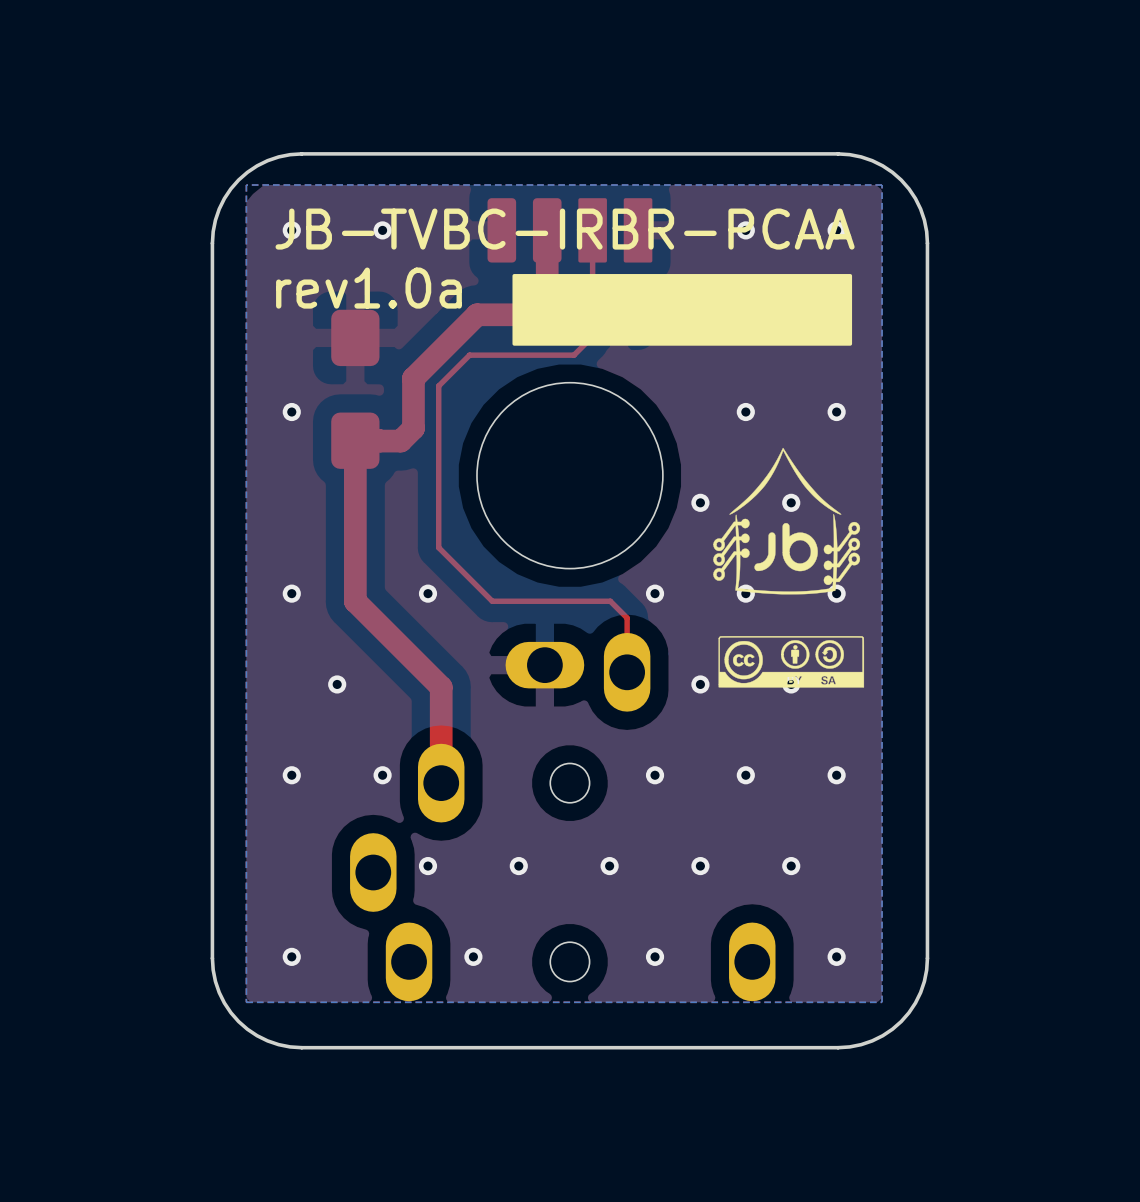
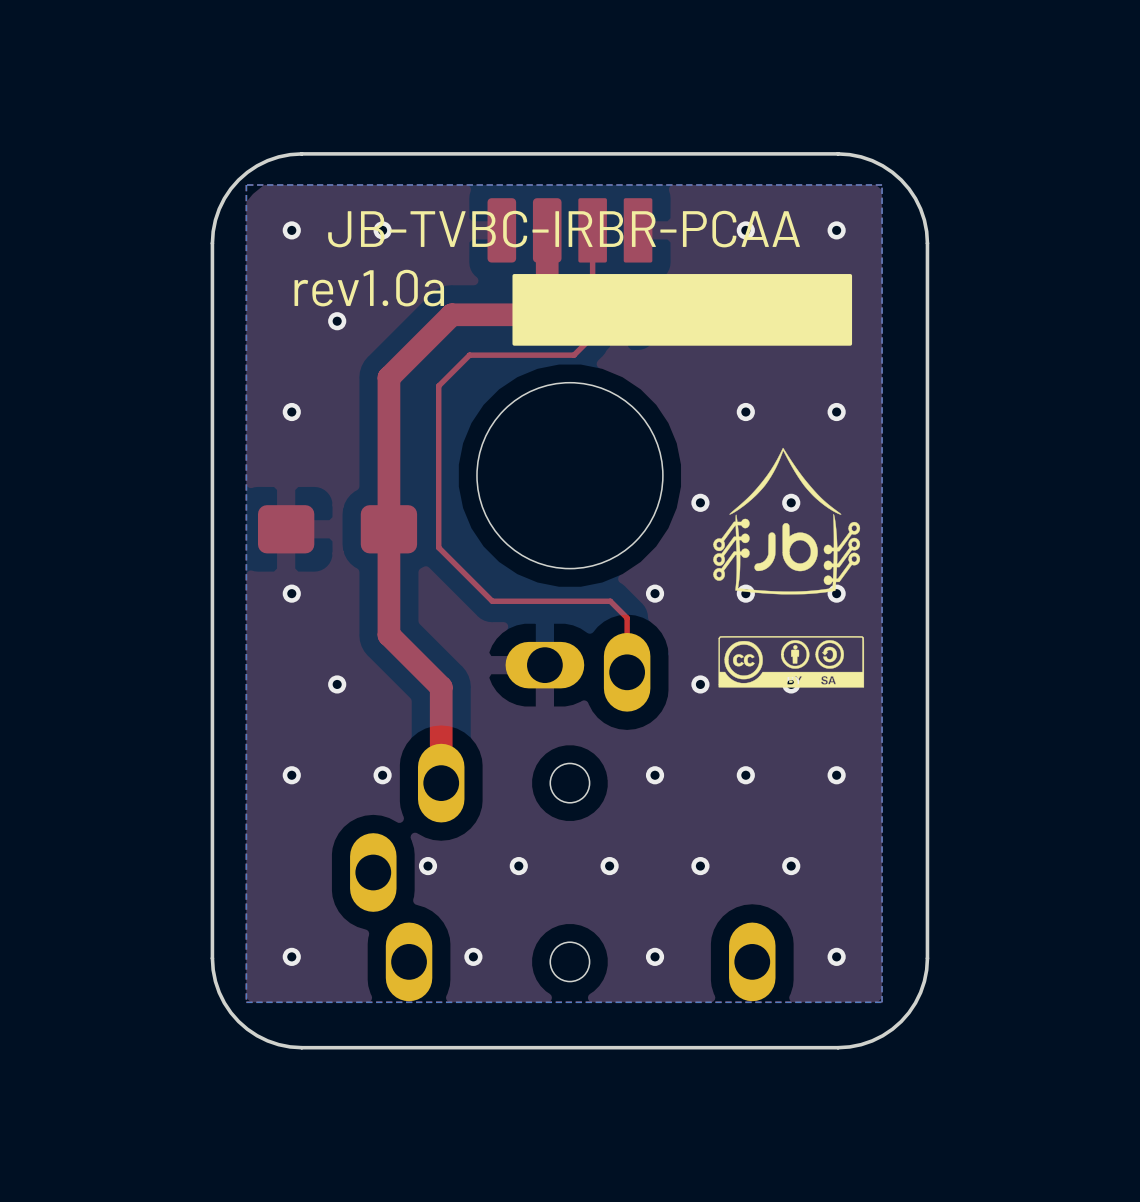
top track: (477, 314) (413, 378) (413, 428) (400, 441) (379, 441) -> none
via: none -> (337, 321)
part rotation: 0° (355, 389) -> 90° clockwise (337, 529)
part position: (355, 389) -> (337, 529)
top track: (379, 440) (355, 440) (355, 601) (388, 635) -> (477, 314) (451, 314) (388, 377) (388, 635)
via: (428, 593) -> none

